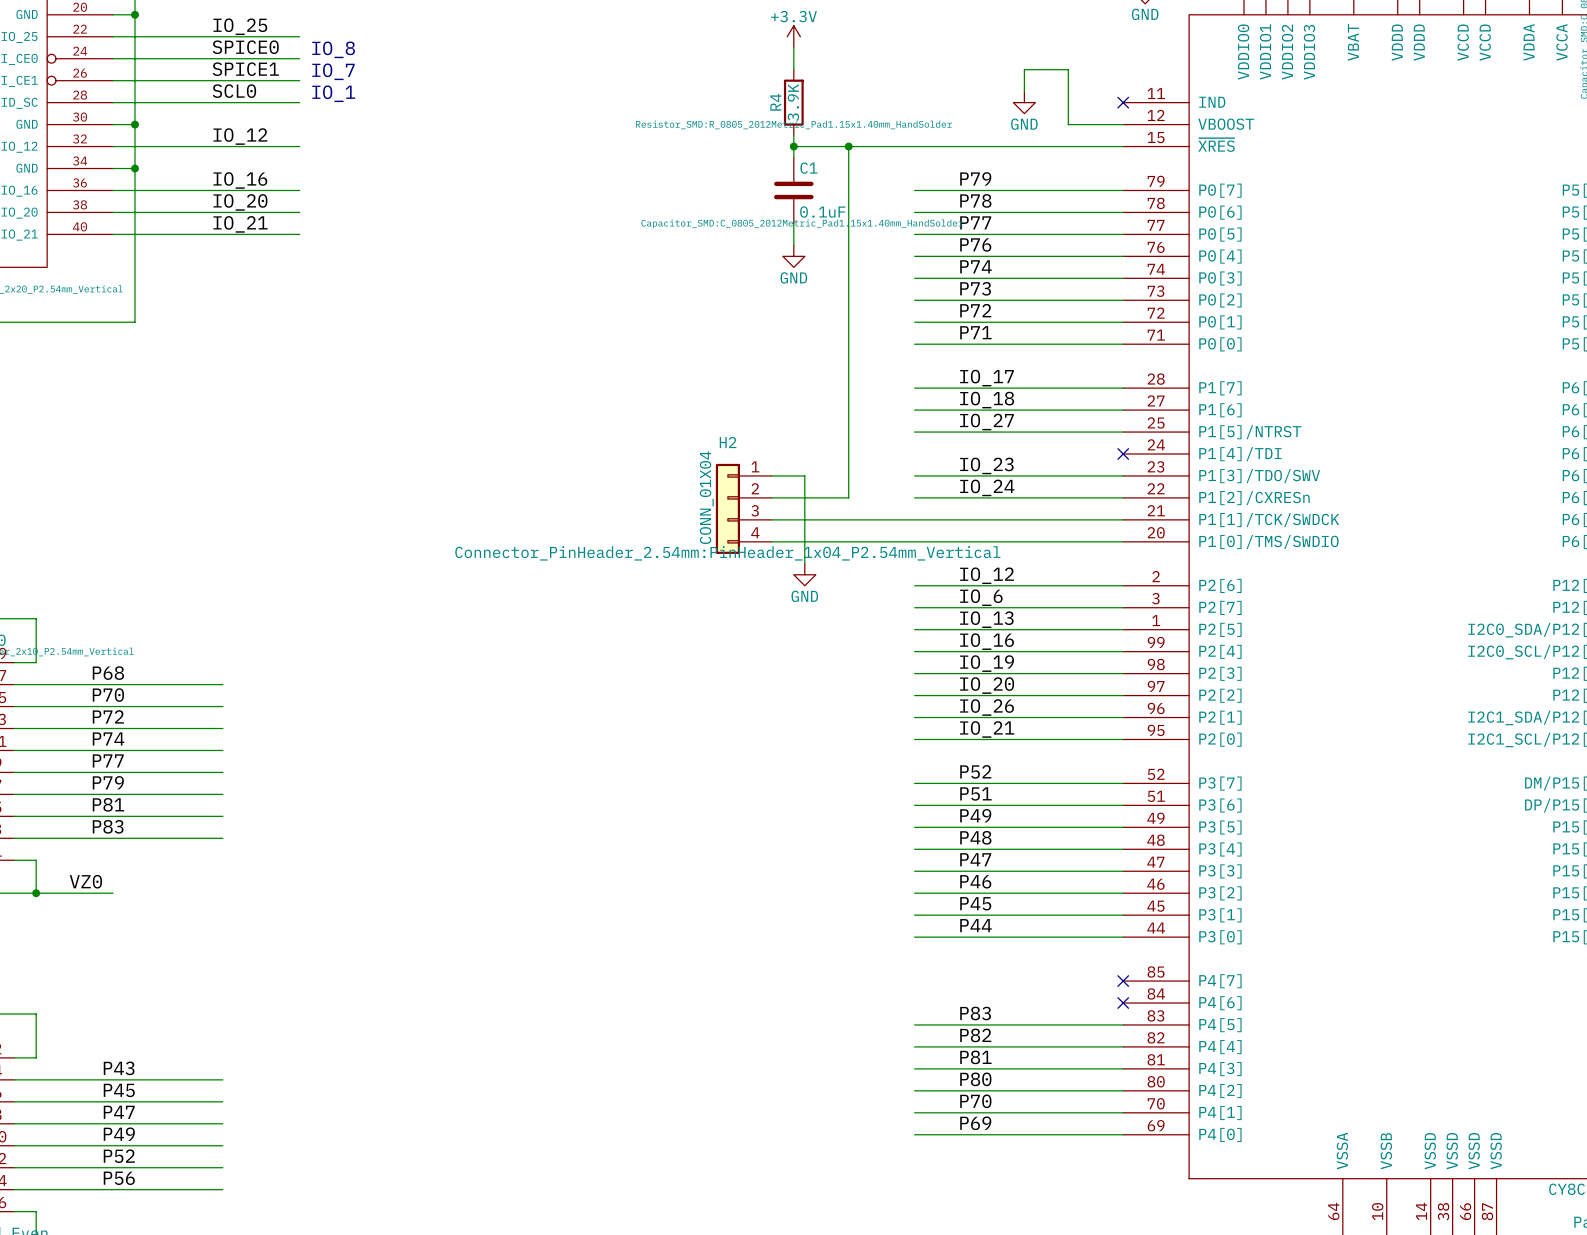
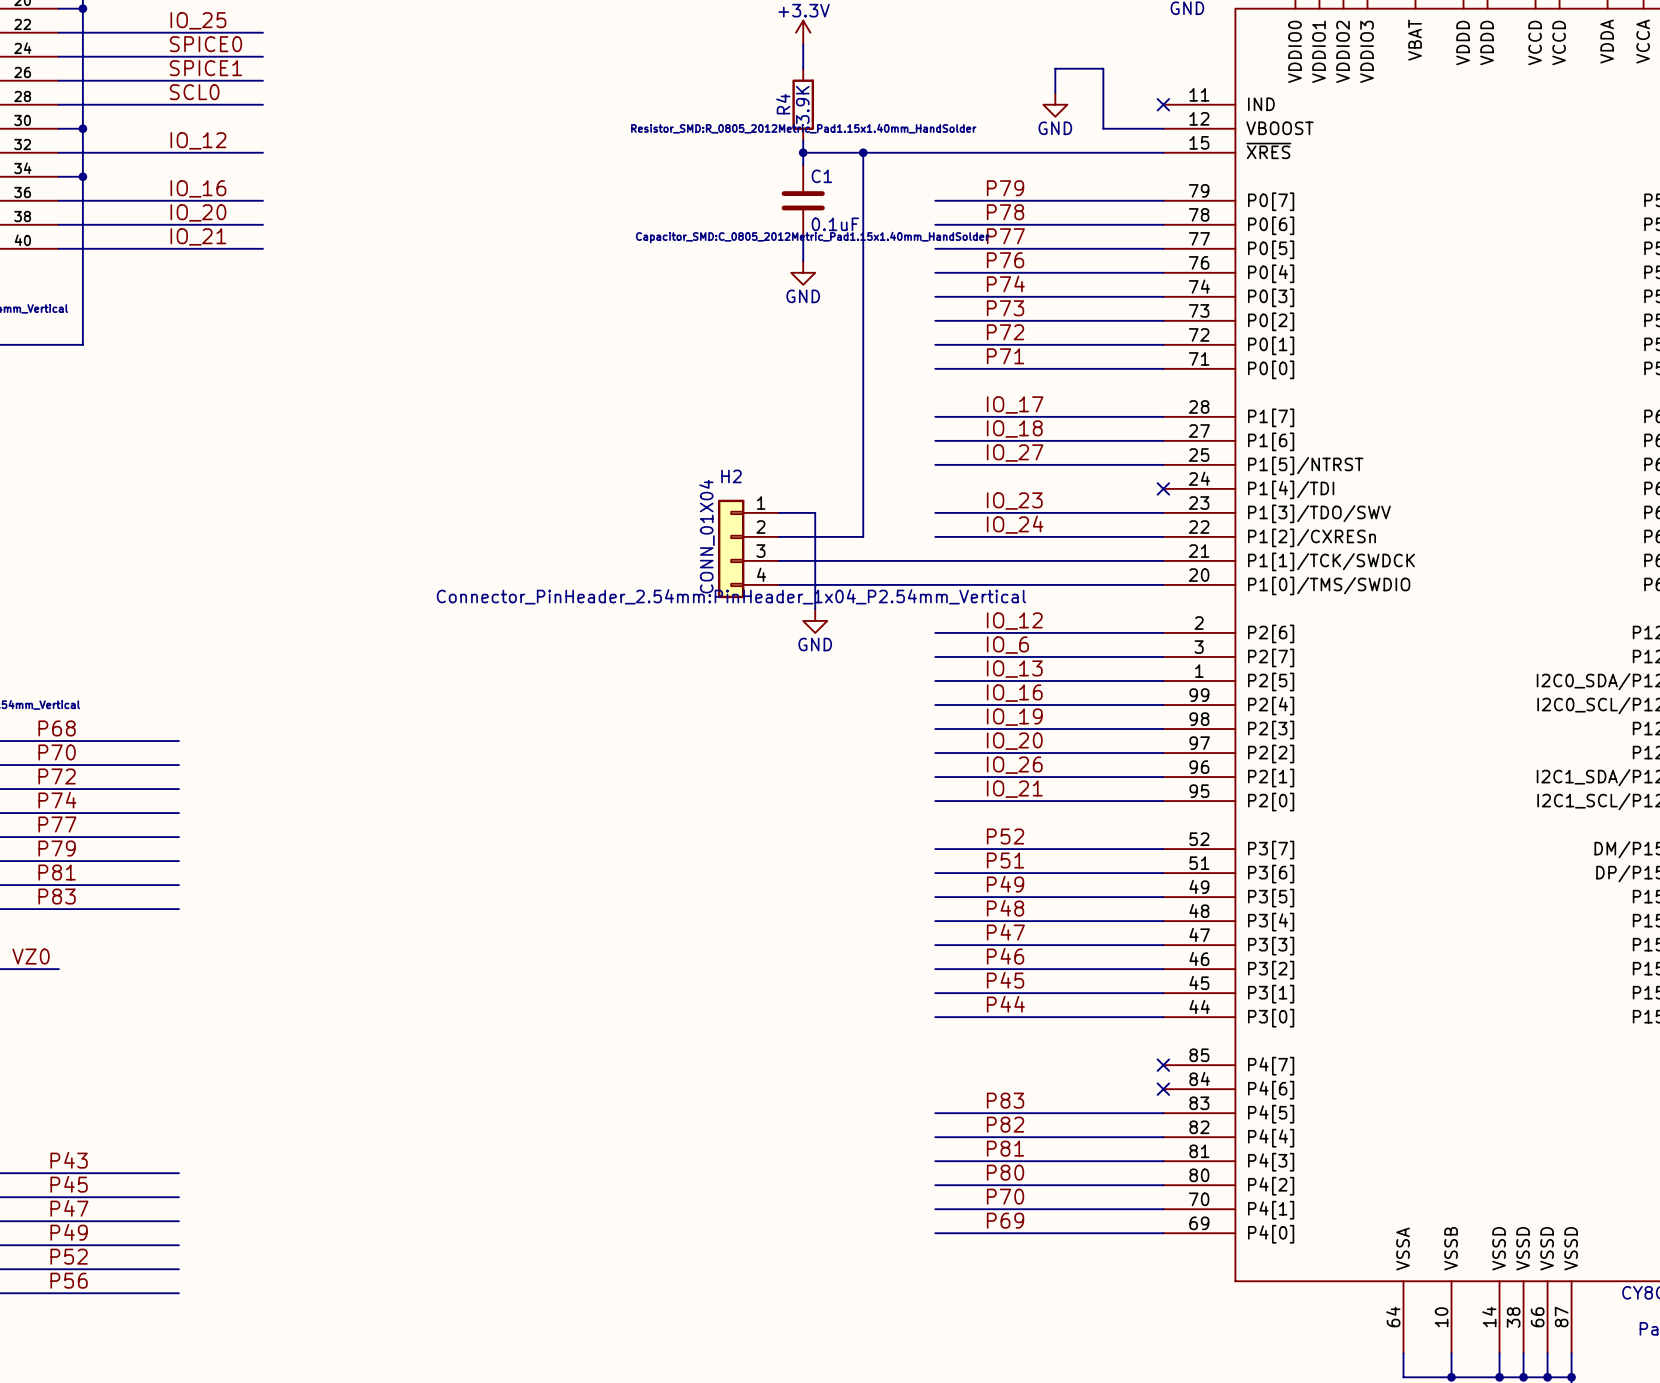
text: IO_8 (333, 49) -> none
text: IO_7 (333, 71) -> none
text: IO_1 (333, 93) -> none

